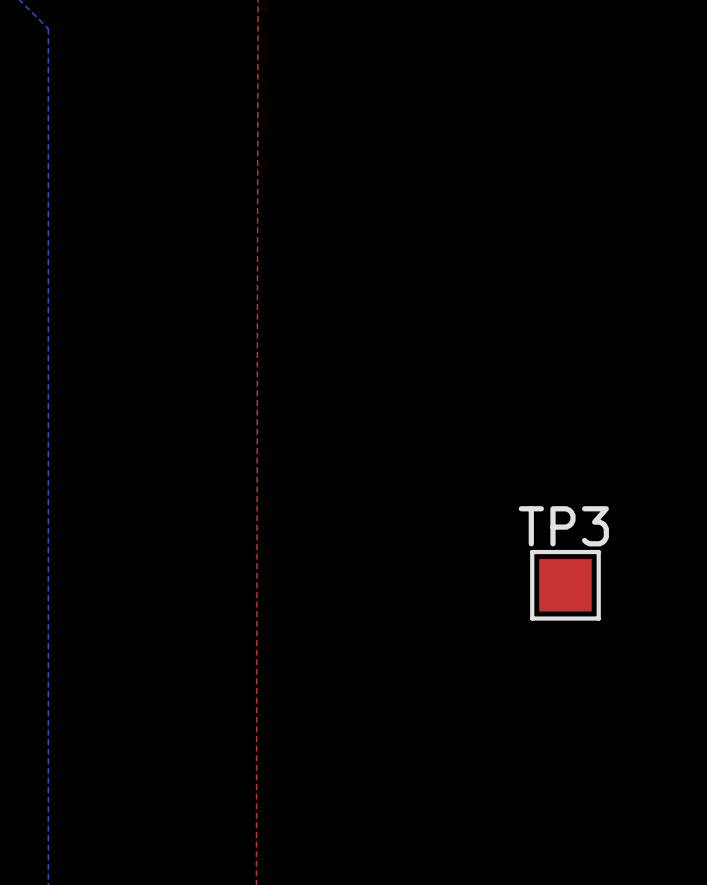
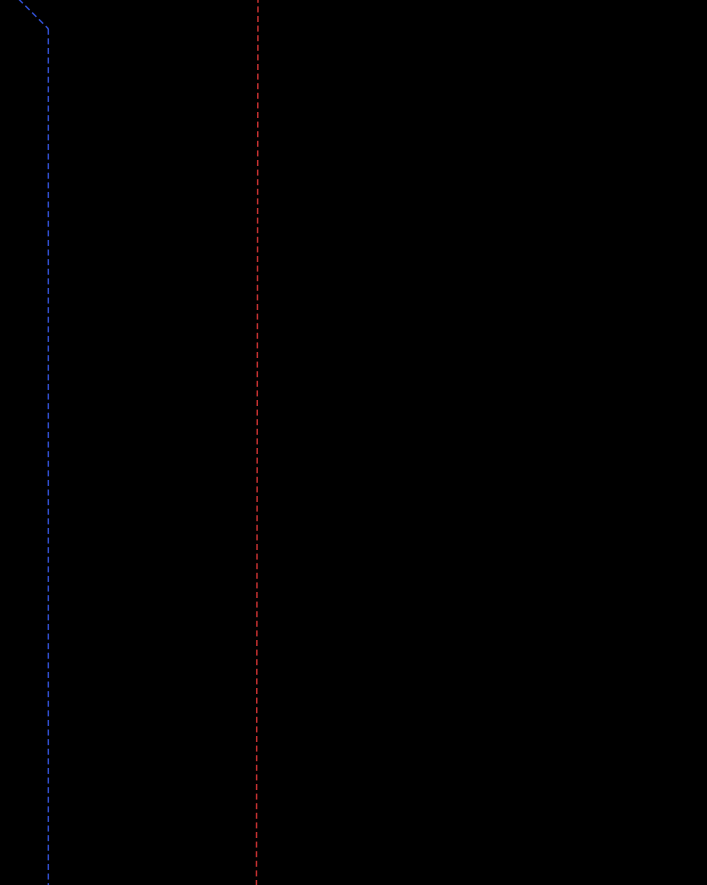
TP3: (565, 585) -> none

